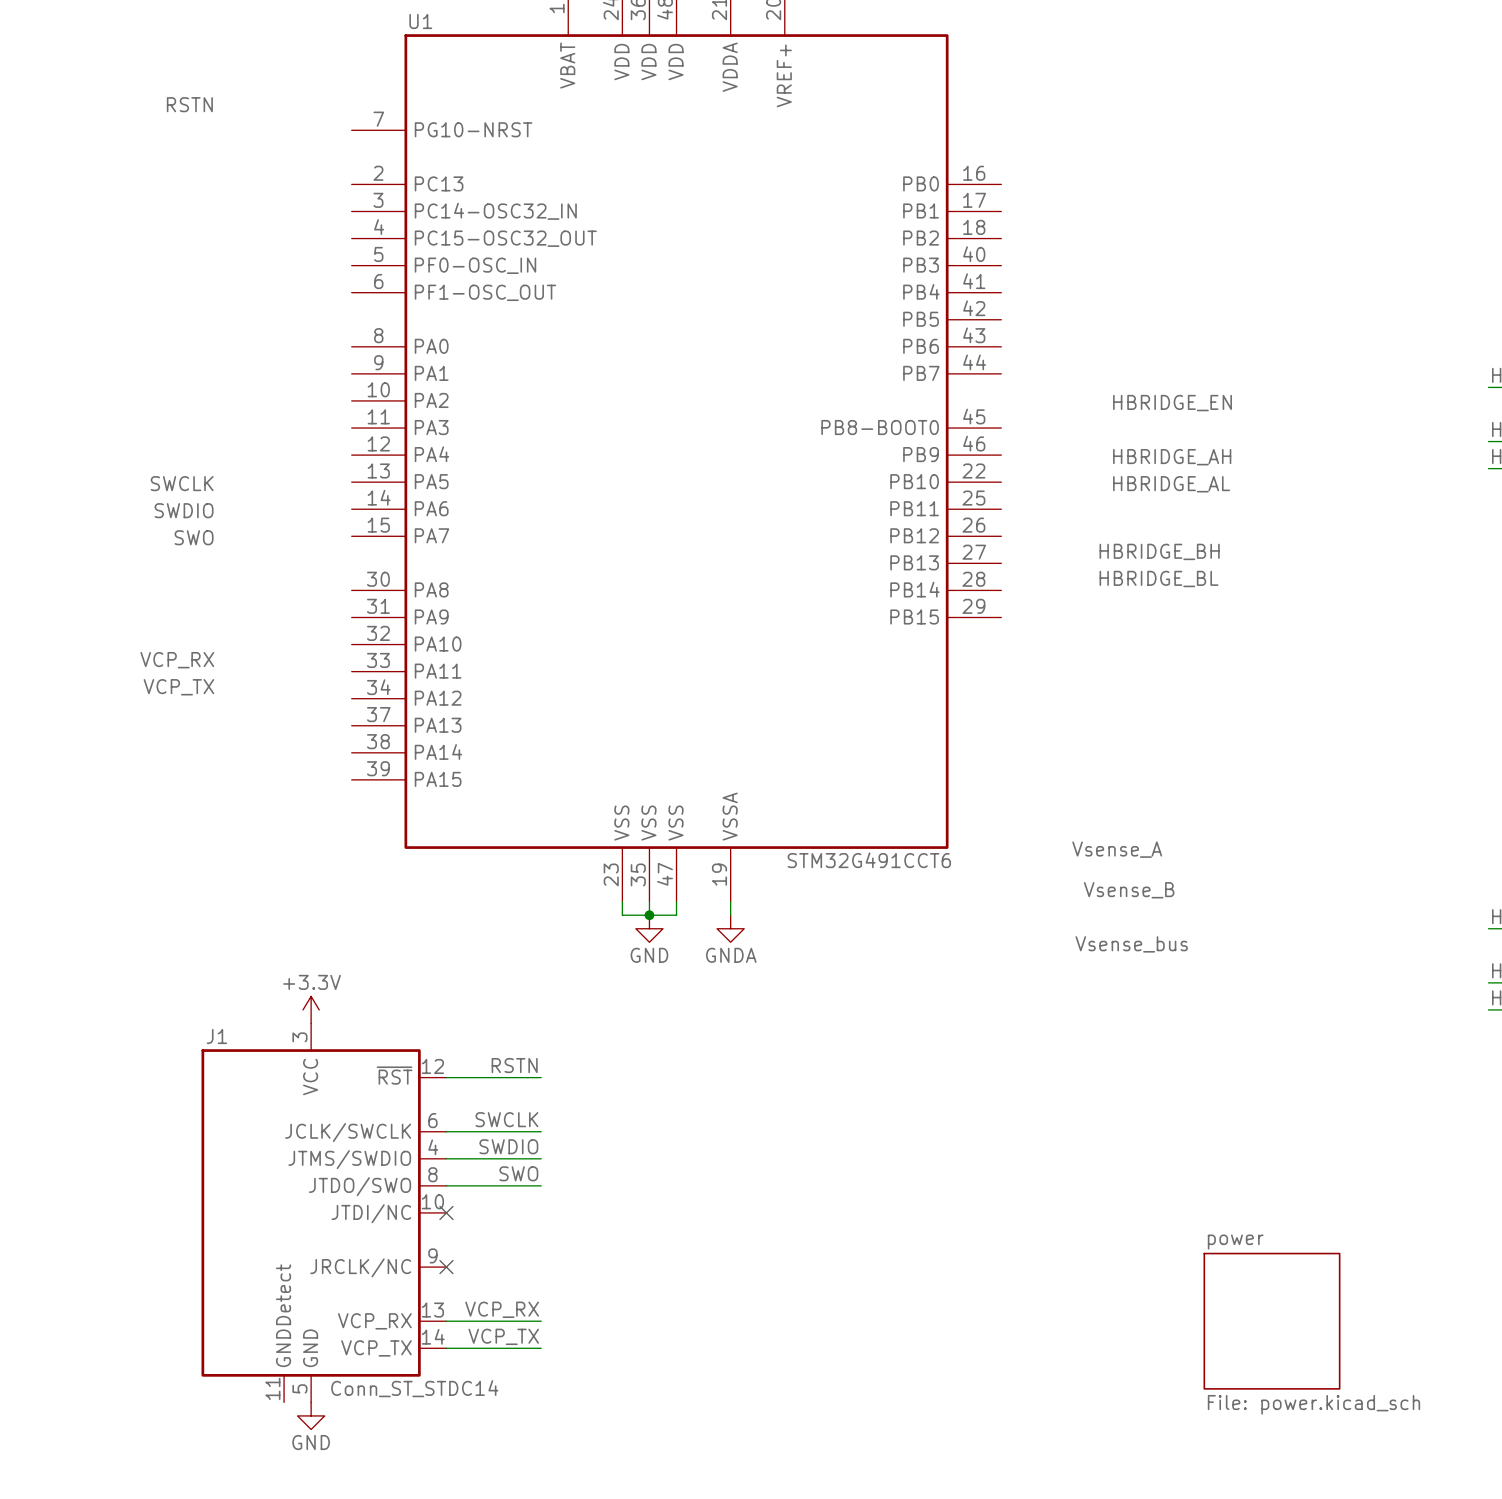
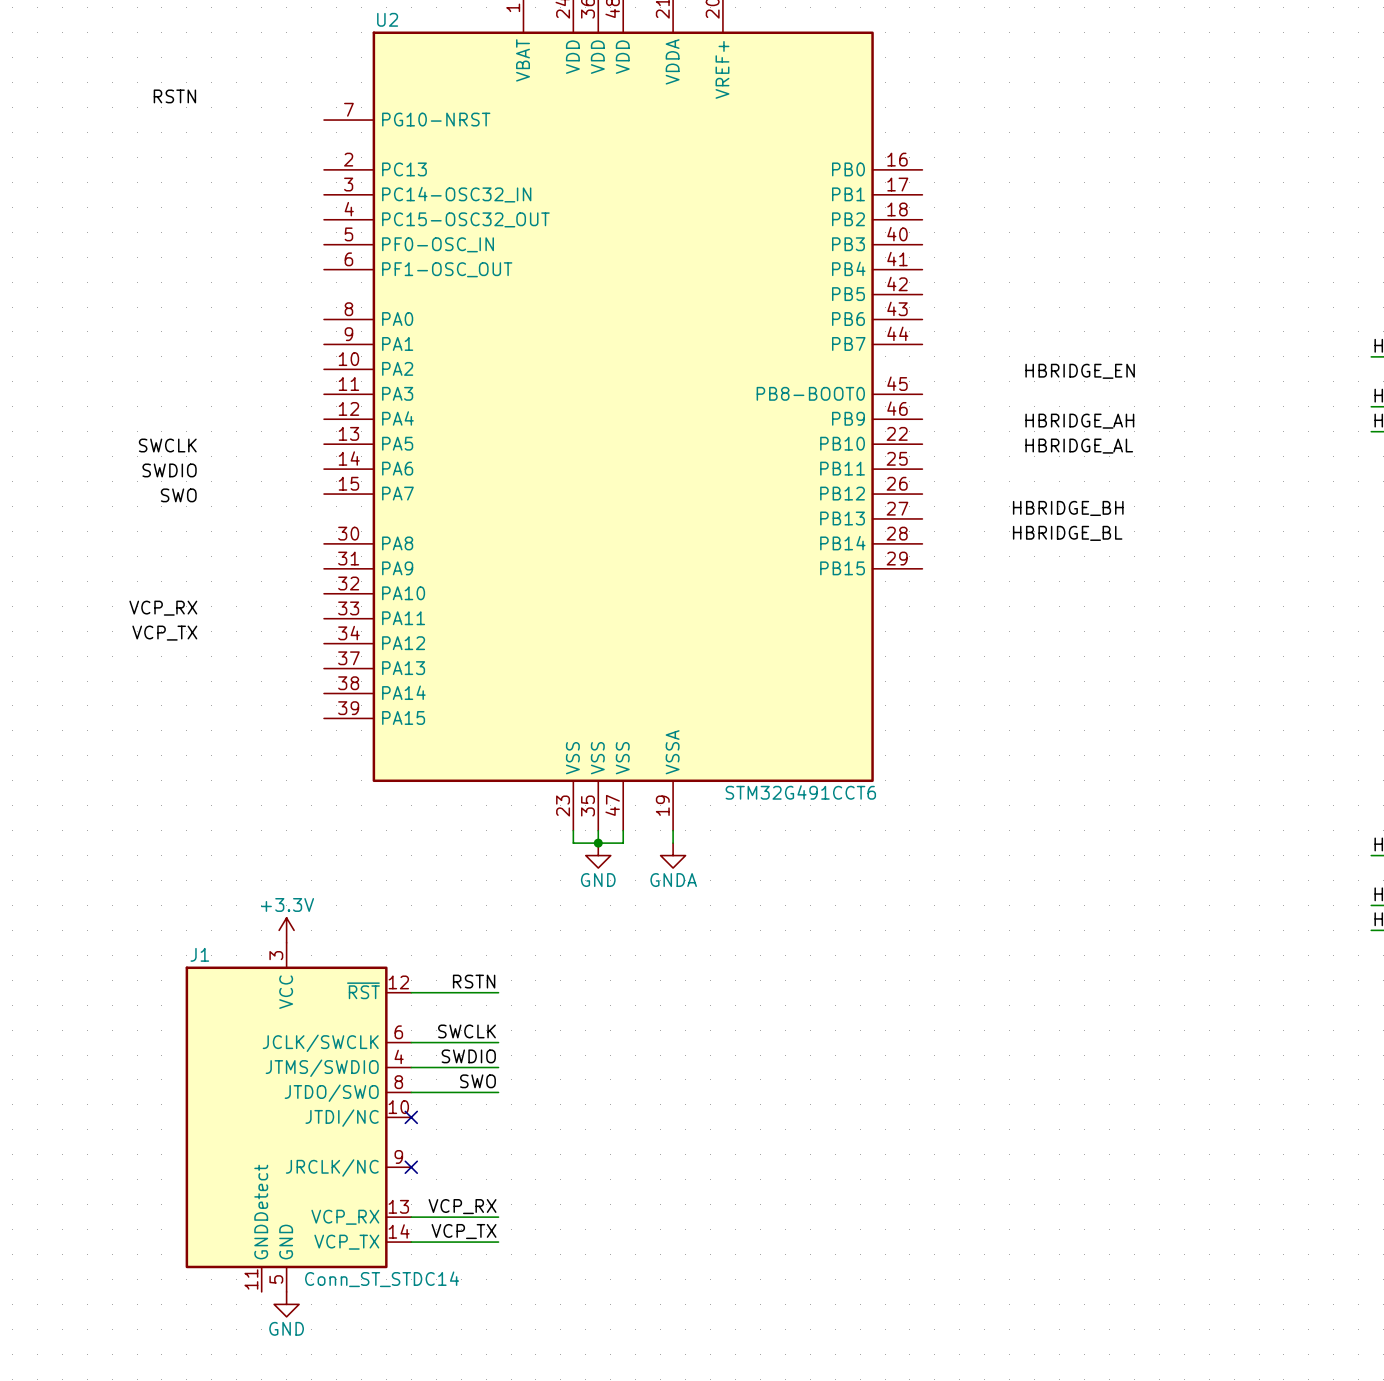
U1 name: U1 (420, 21) -> U2 (387, 19)
label: Vsense_A (1117, 849) -> none
label: Vsense_B (1129, 890) -> none
label: Vsense_bus (1131, 944) -> none
sheet power: File: power.kicad_sch (1271, 1321) -> none

